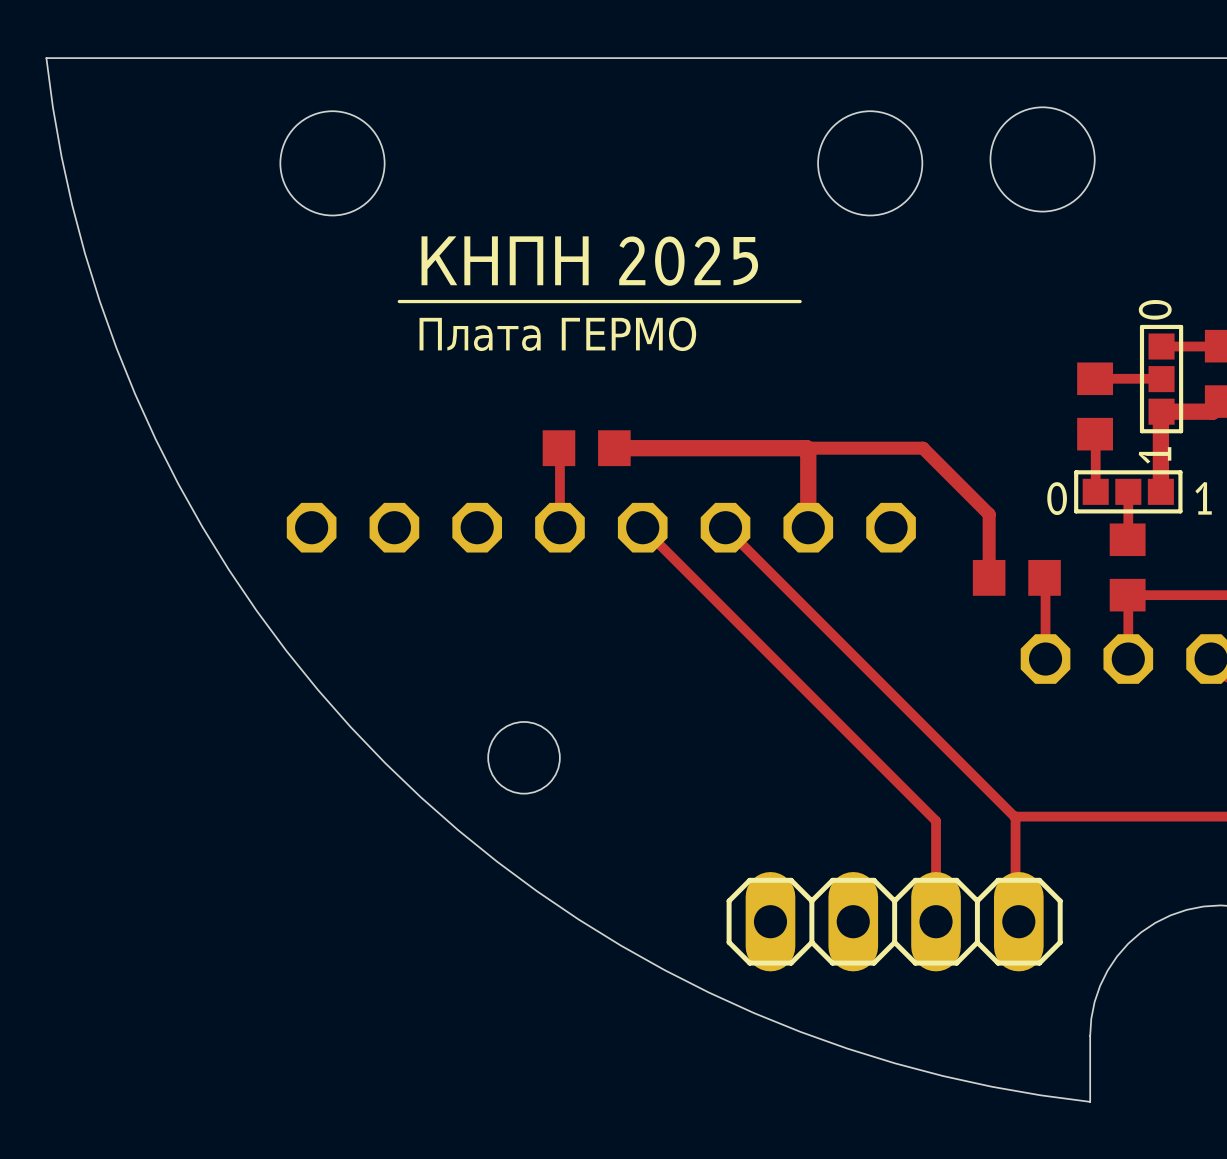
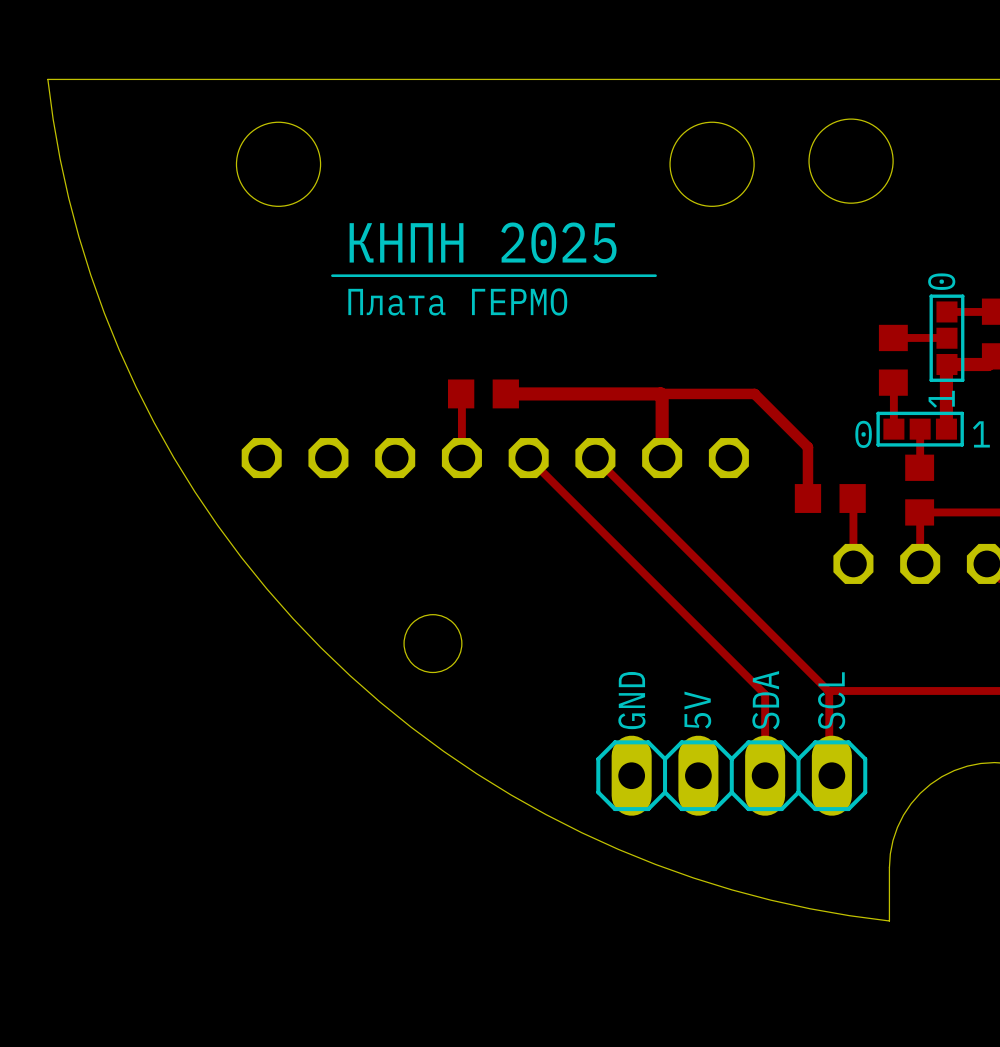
text: none -> GND (631, 700)
text: none -> SDA (765, 700)
text: none -> SCL (831, 700)
text: none -> 5V (697, 710)

